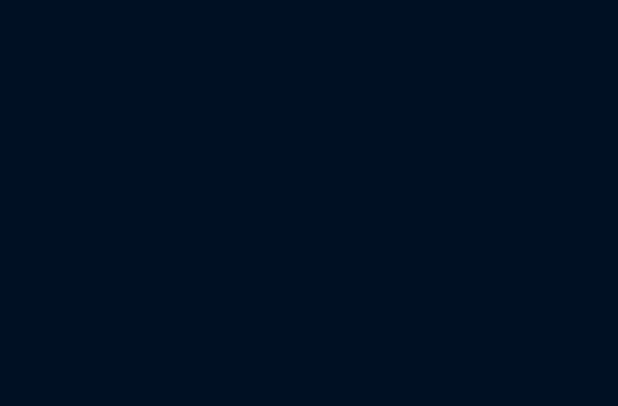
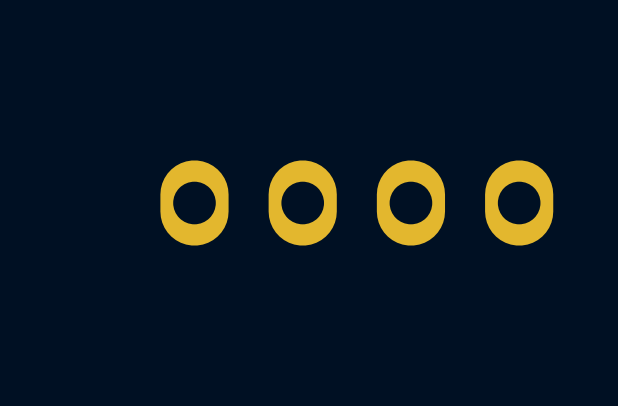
part: none -> (356, 203)

